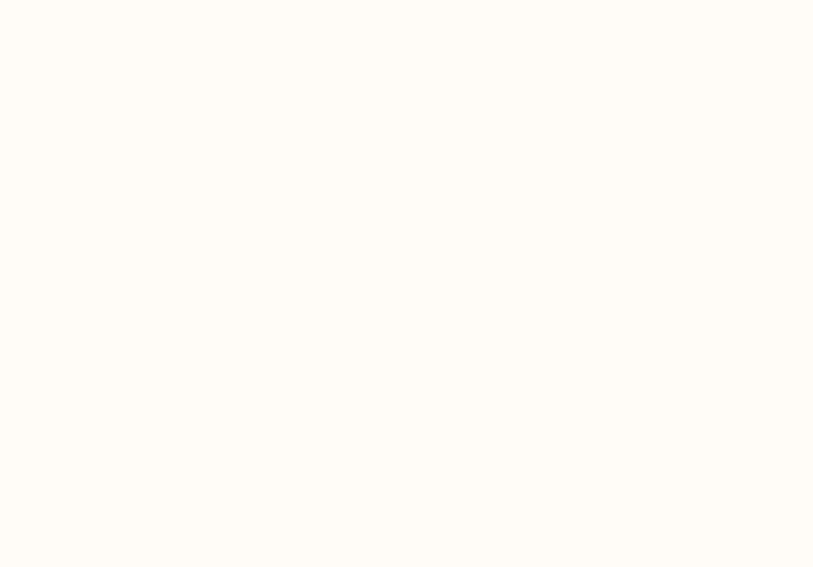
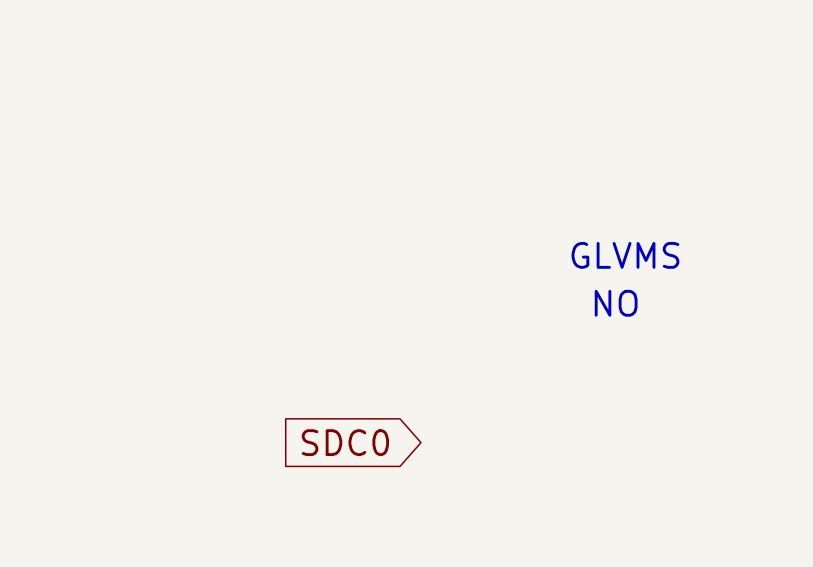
text: none -> GLVMS (625, 255)
text: none -> NO (616, 303)
global label: none -> SDC0 (345, 442)

